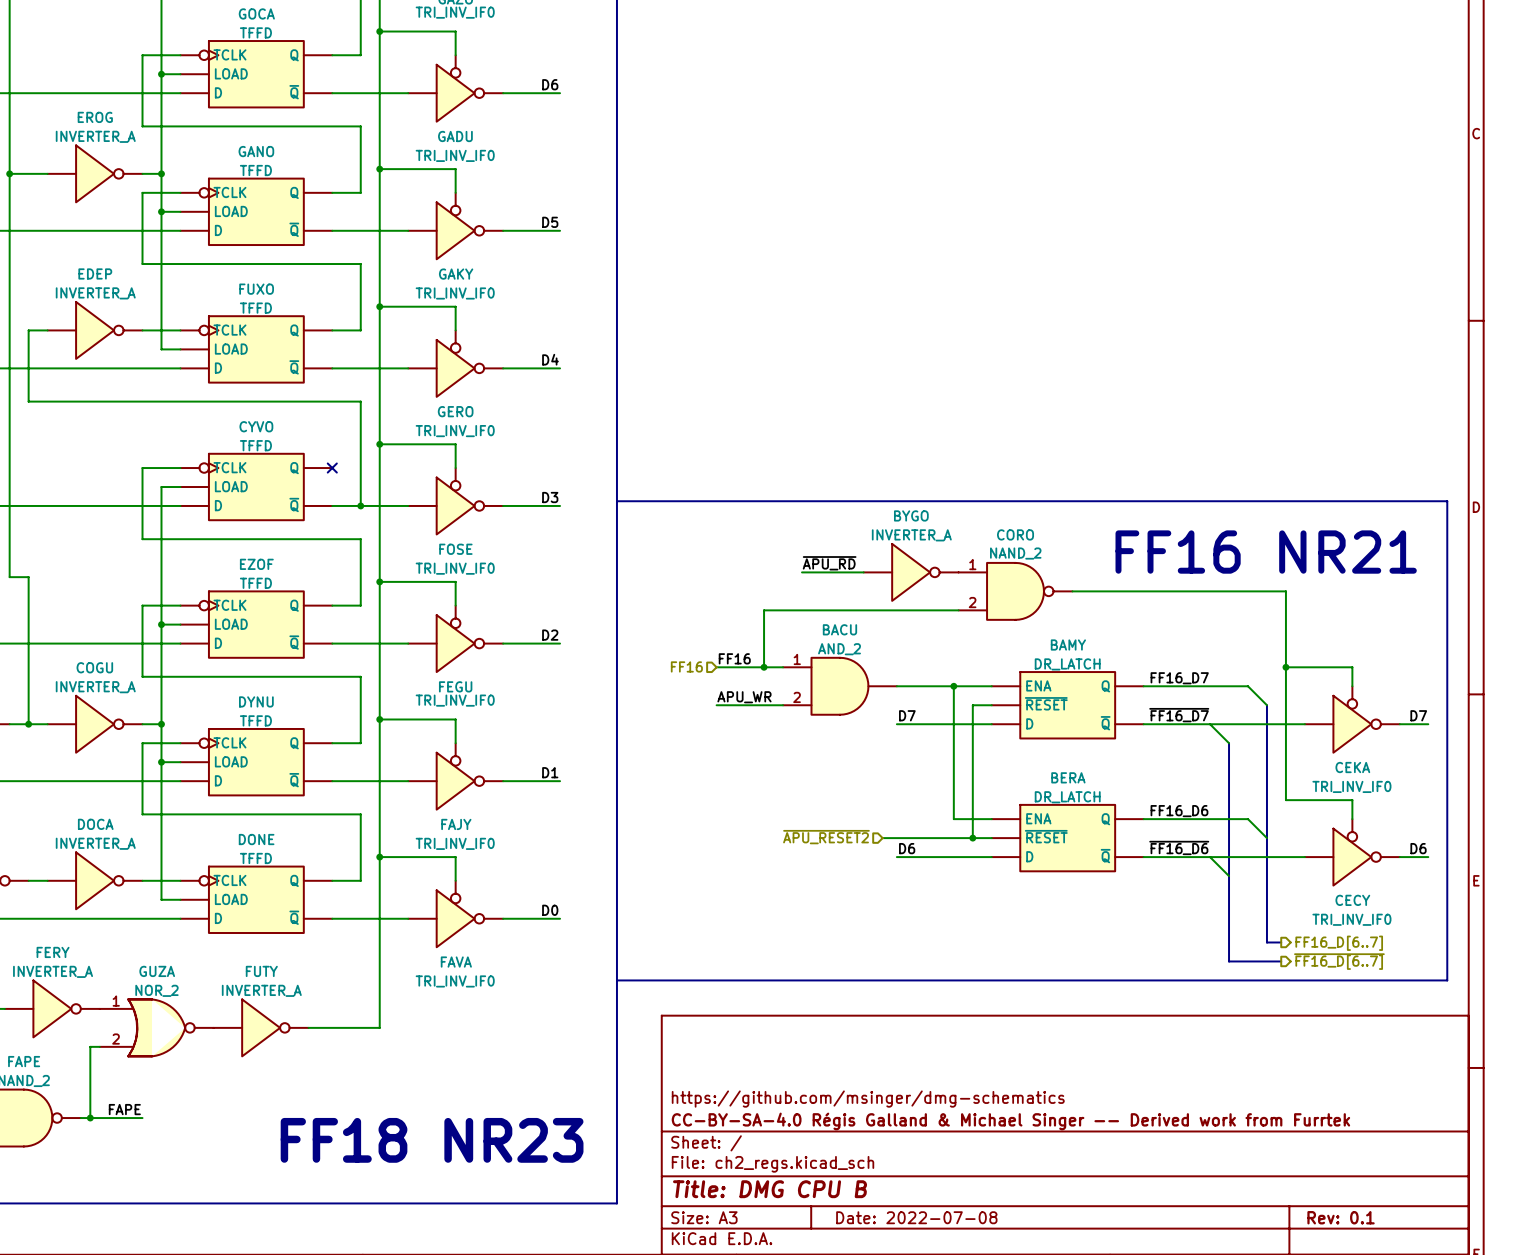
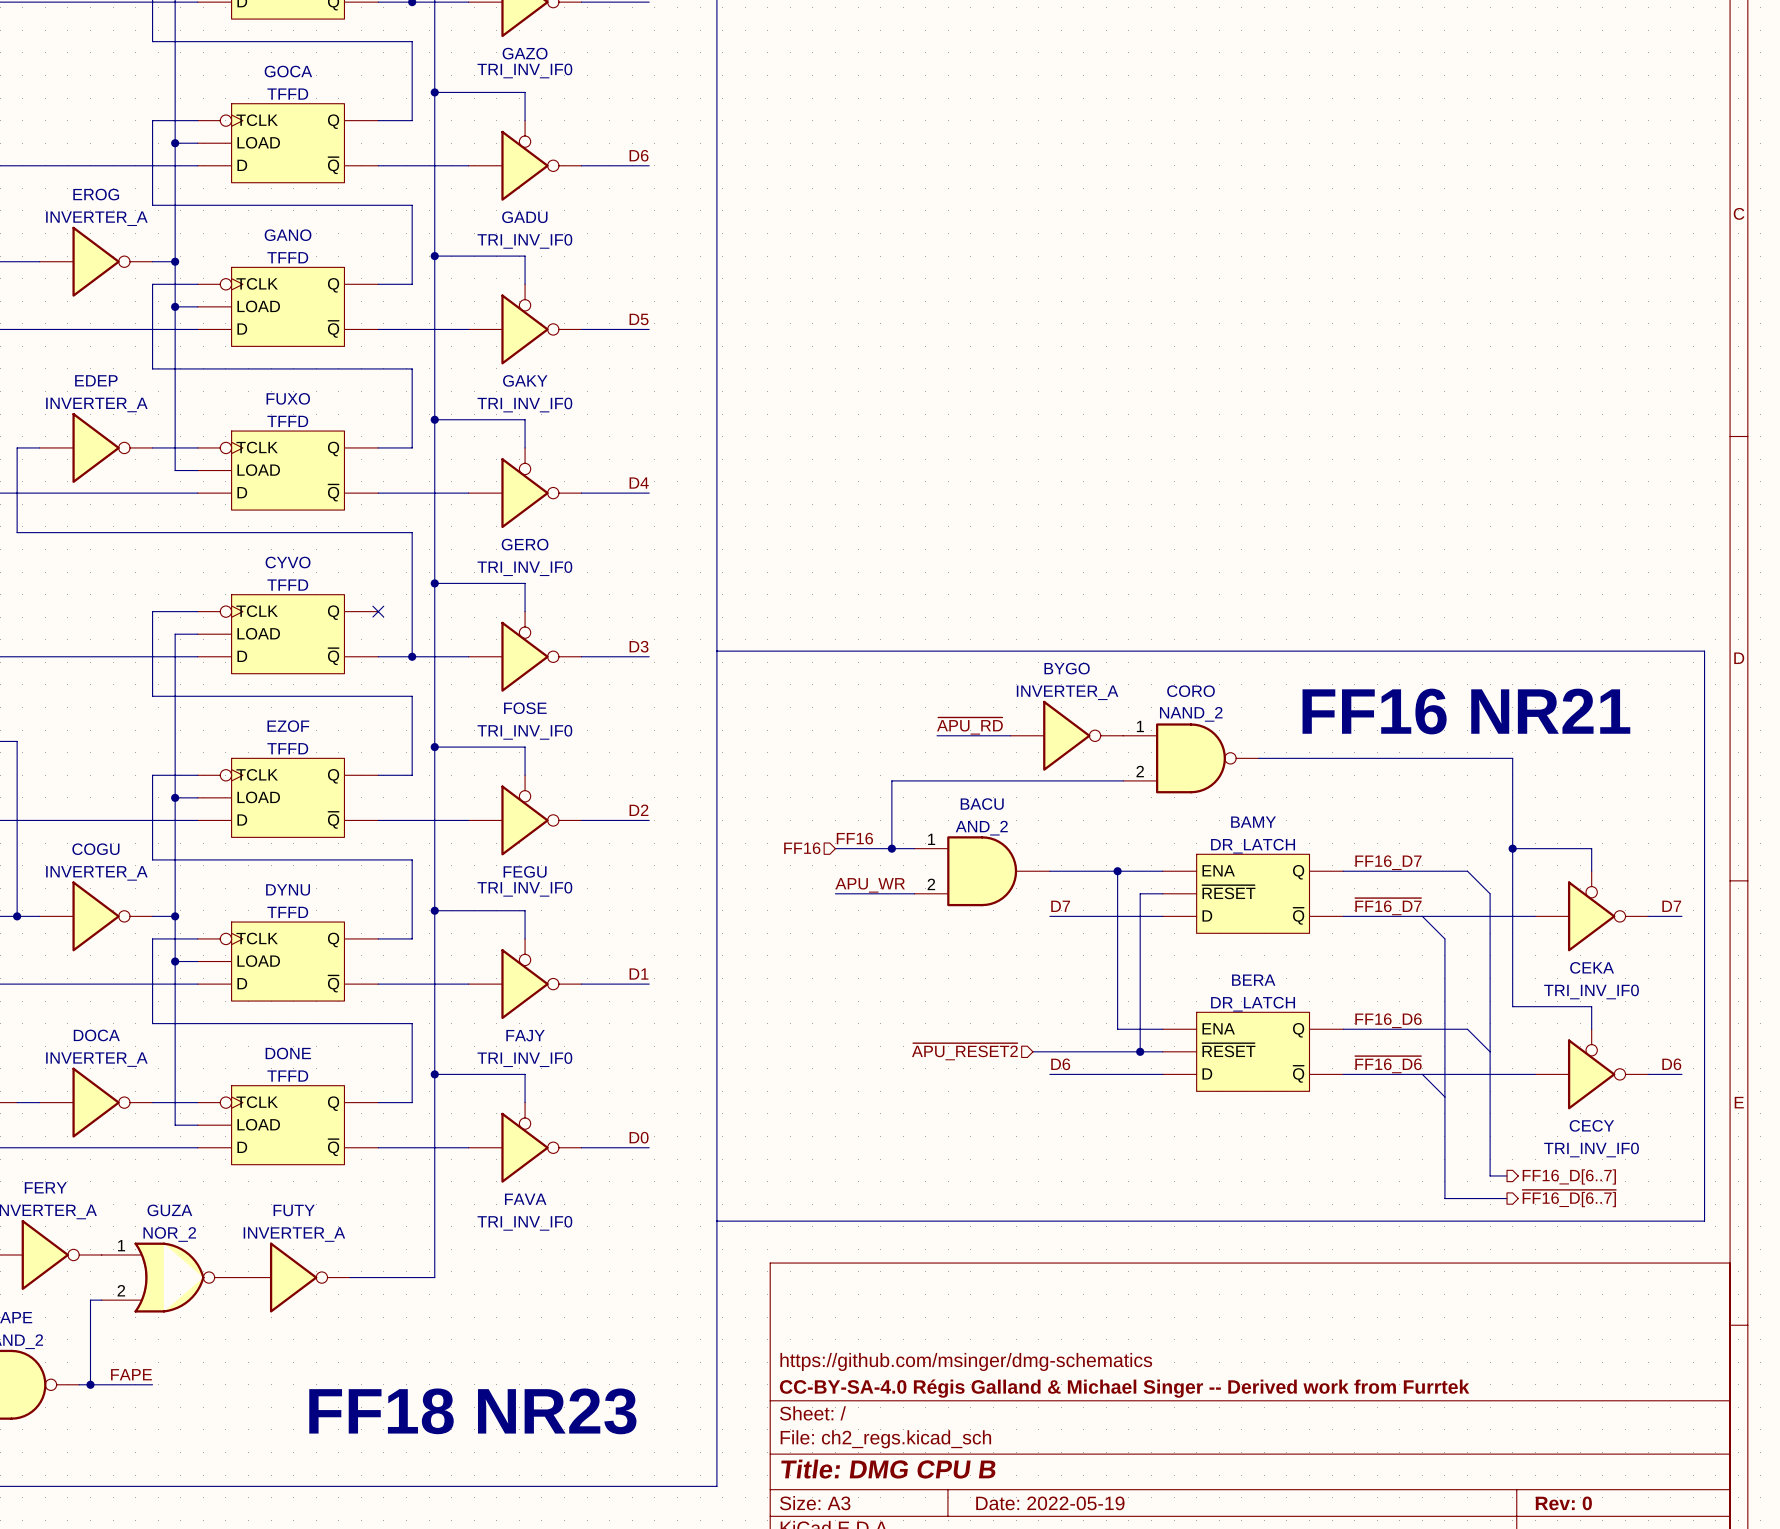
title block: Date: 2022-07-08 (916, 1217) -> Date: 2022-05-19 (1050, 1503)
title block: Rev: 0.1 (1341, 1217) -> Rev: 0 (1563, 1503)

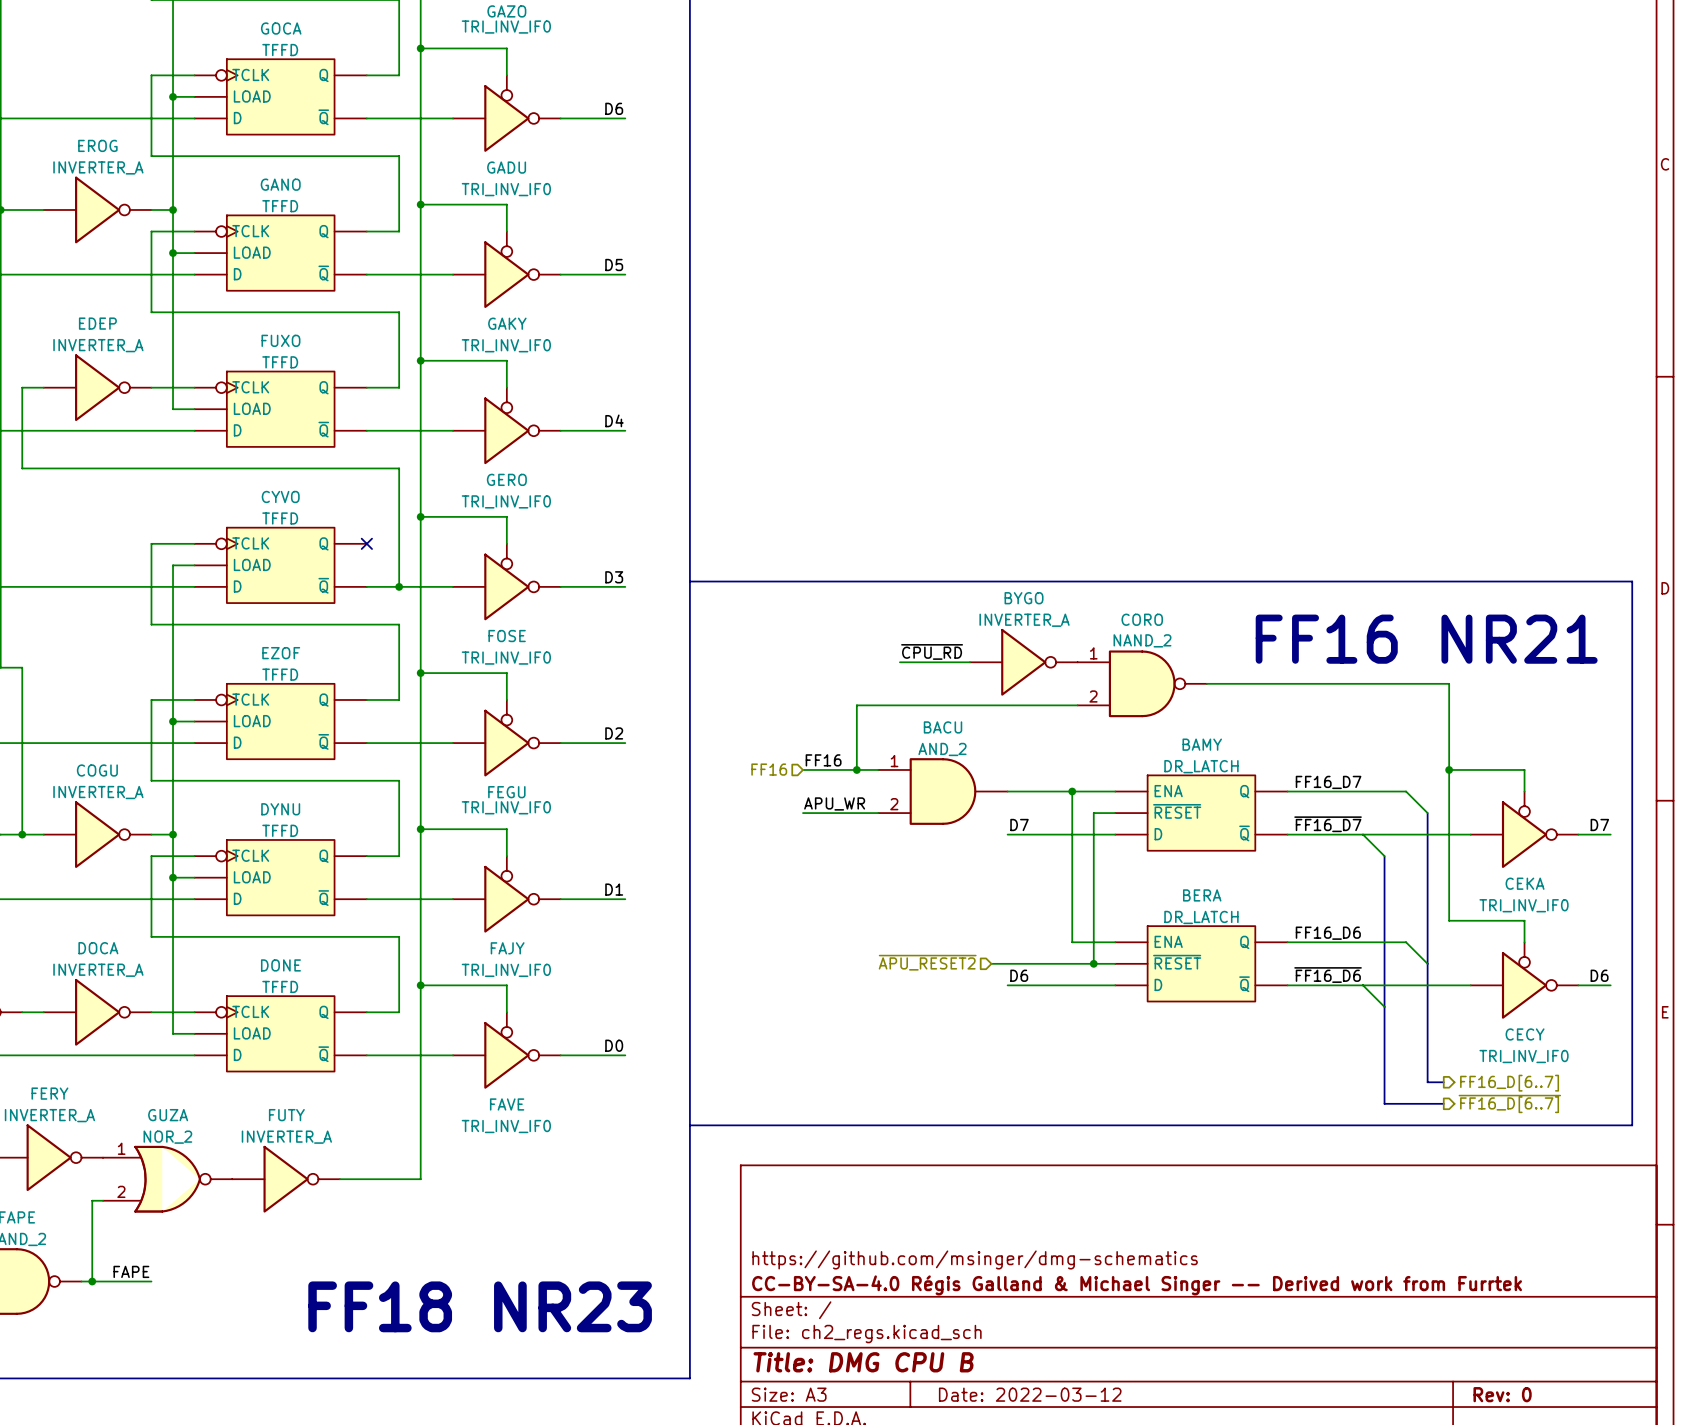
label: ~{APU_RD} (969, 726) -> ~{CPU_RD} (932, 651)
FAVA name: FAVA (525, 1199) -> FAVE (507, 1104)
title block: Date: 2022-05-19 (1050, 1503) -> Date: 2022-03-12 (1030, 1394)

